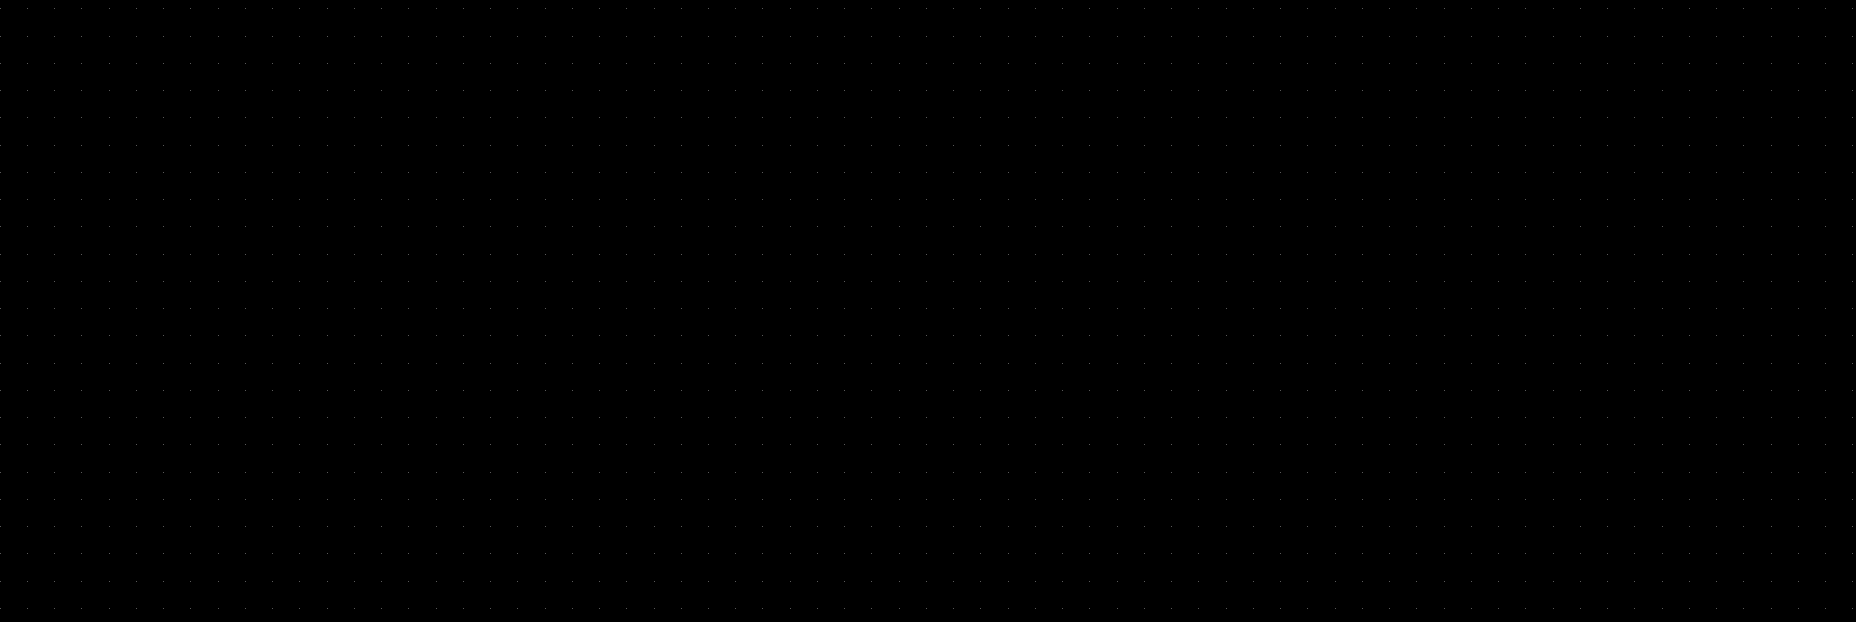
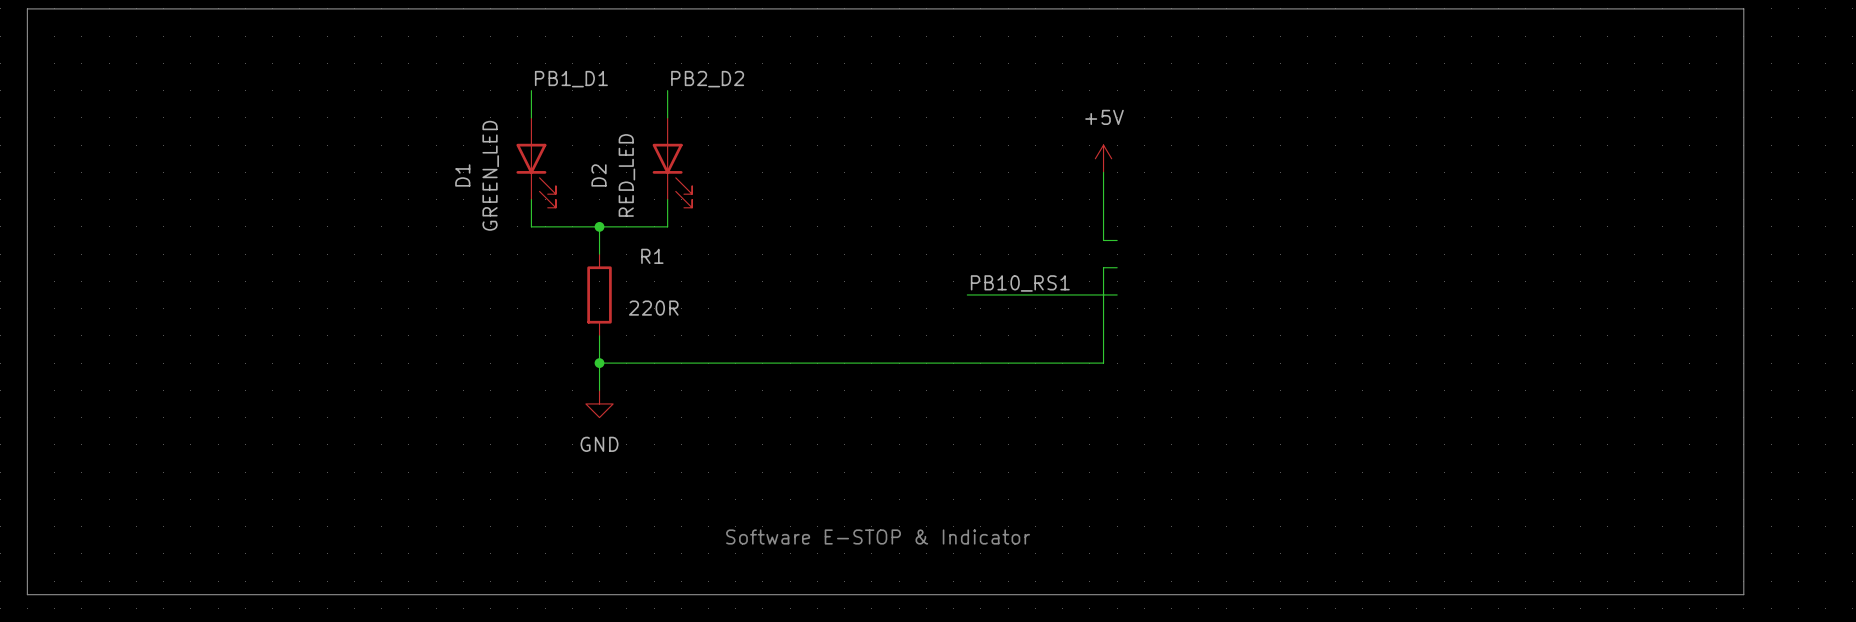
line: none -> (27, 8) (27, 594) (1743, 594) (1743, 8) (27, 8)
label: none -> PB1_D1 (571, 79)
label: none -> PB2_D2 (707, 79)
wire: none -> (531, 90) (531, 117)
wire: none -> (667, 90) (667, 117)
power symbol: none -> +5V (1103, 158)
D1: none -> GREEN_LED (536, 162)
D2: none -> RED_LED (672, 162)
wire: none -> (1103, 172) (1103, 240) (1117, 240)
wire: none -> (531, 199) (531, 226) (667, 226) (667, 199)
wire: none -> (599, 226) (599, 254)
junction: none -> (599, 226)
wire: none -> (1117, 267) (1103, 267) (1103, 363) (599, 363)
label: none -> PB10_RS1 (1020, 283)
R1: none -> 220R (599, 294)
wire: none -> (967, 294) (1117, 294)
wire: none -> (599, 335) (599, 390)
junction: none -> (599, 363)
power symbol: none -> GND (599, 403)
text: none -> Software E-STOP & Indicator (878, 536)

